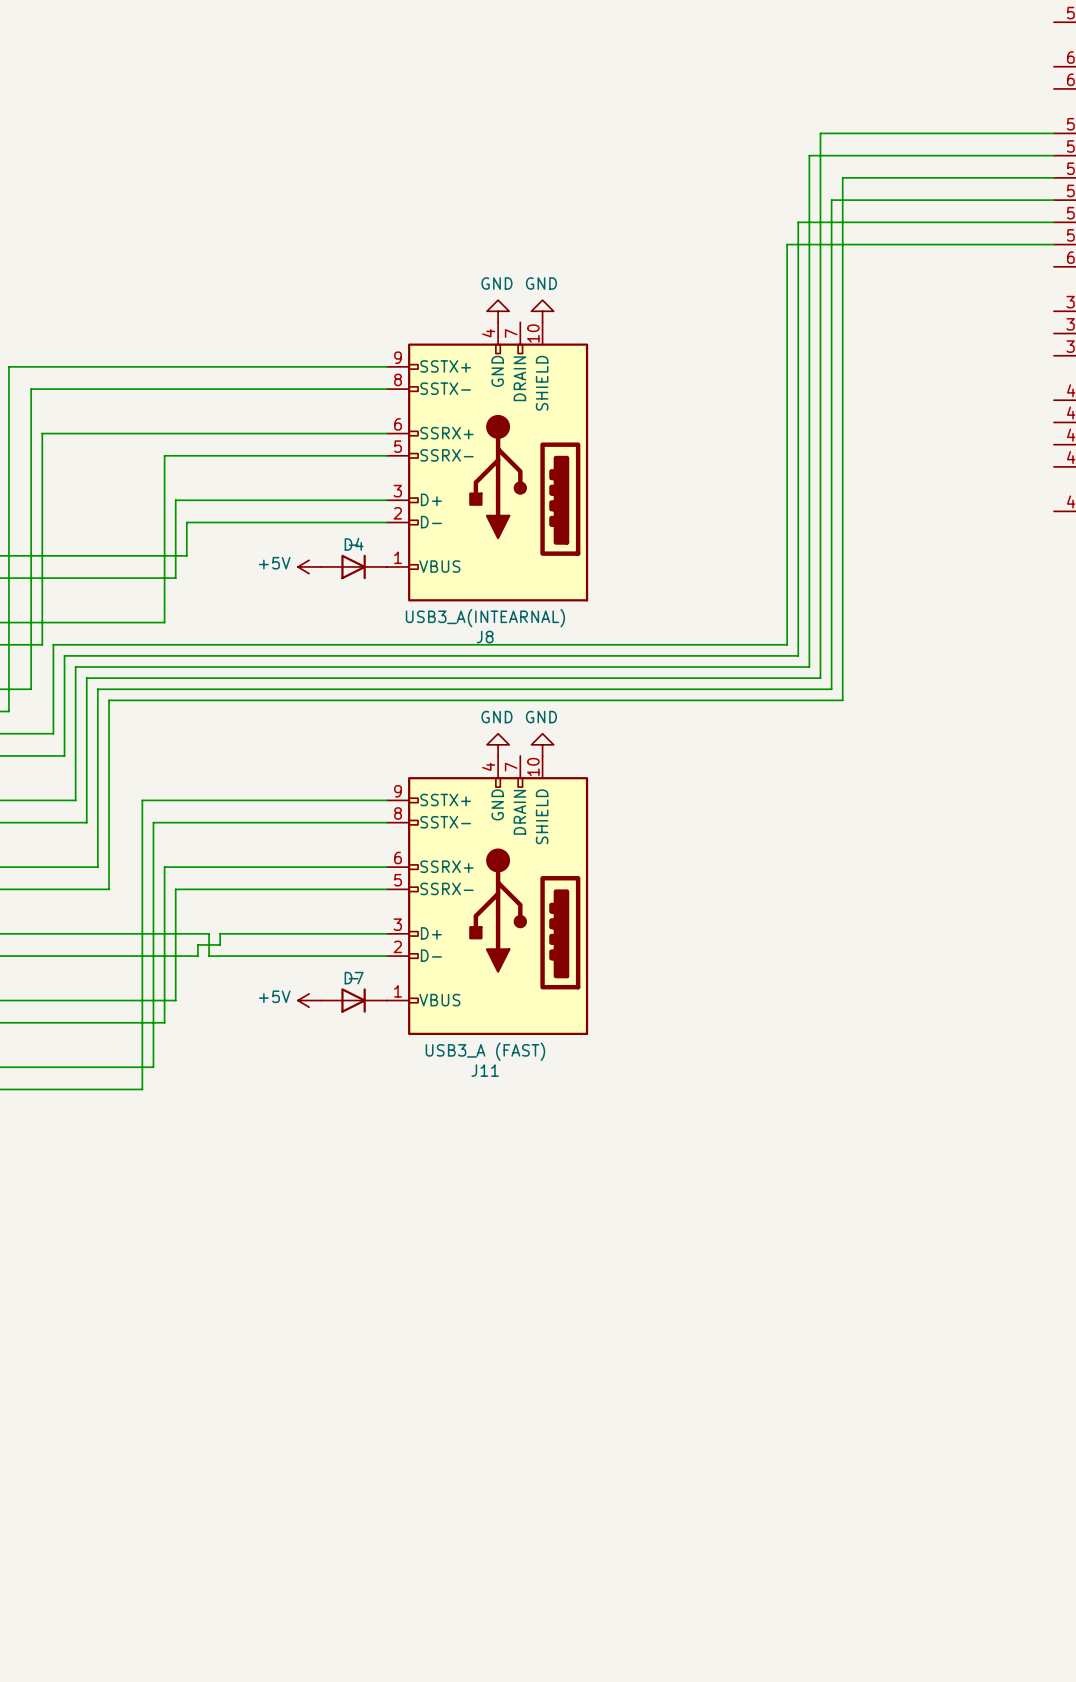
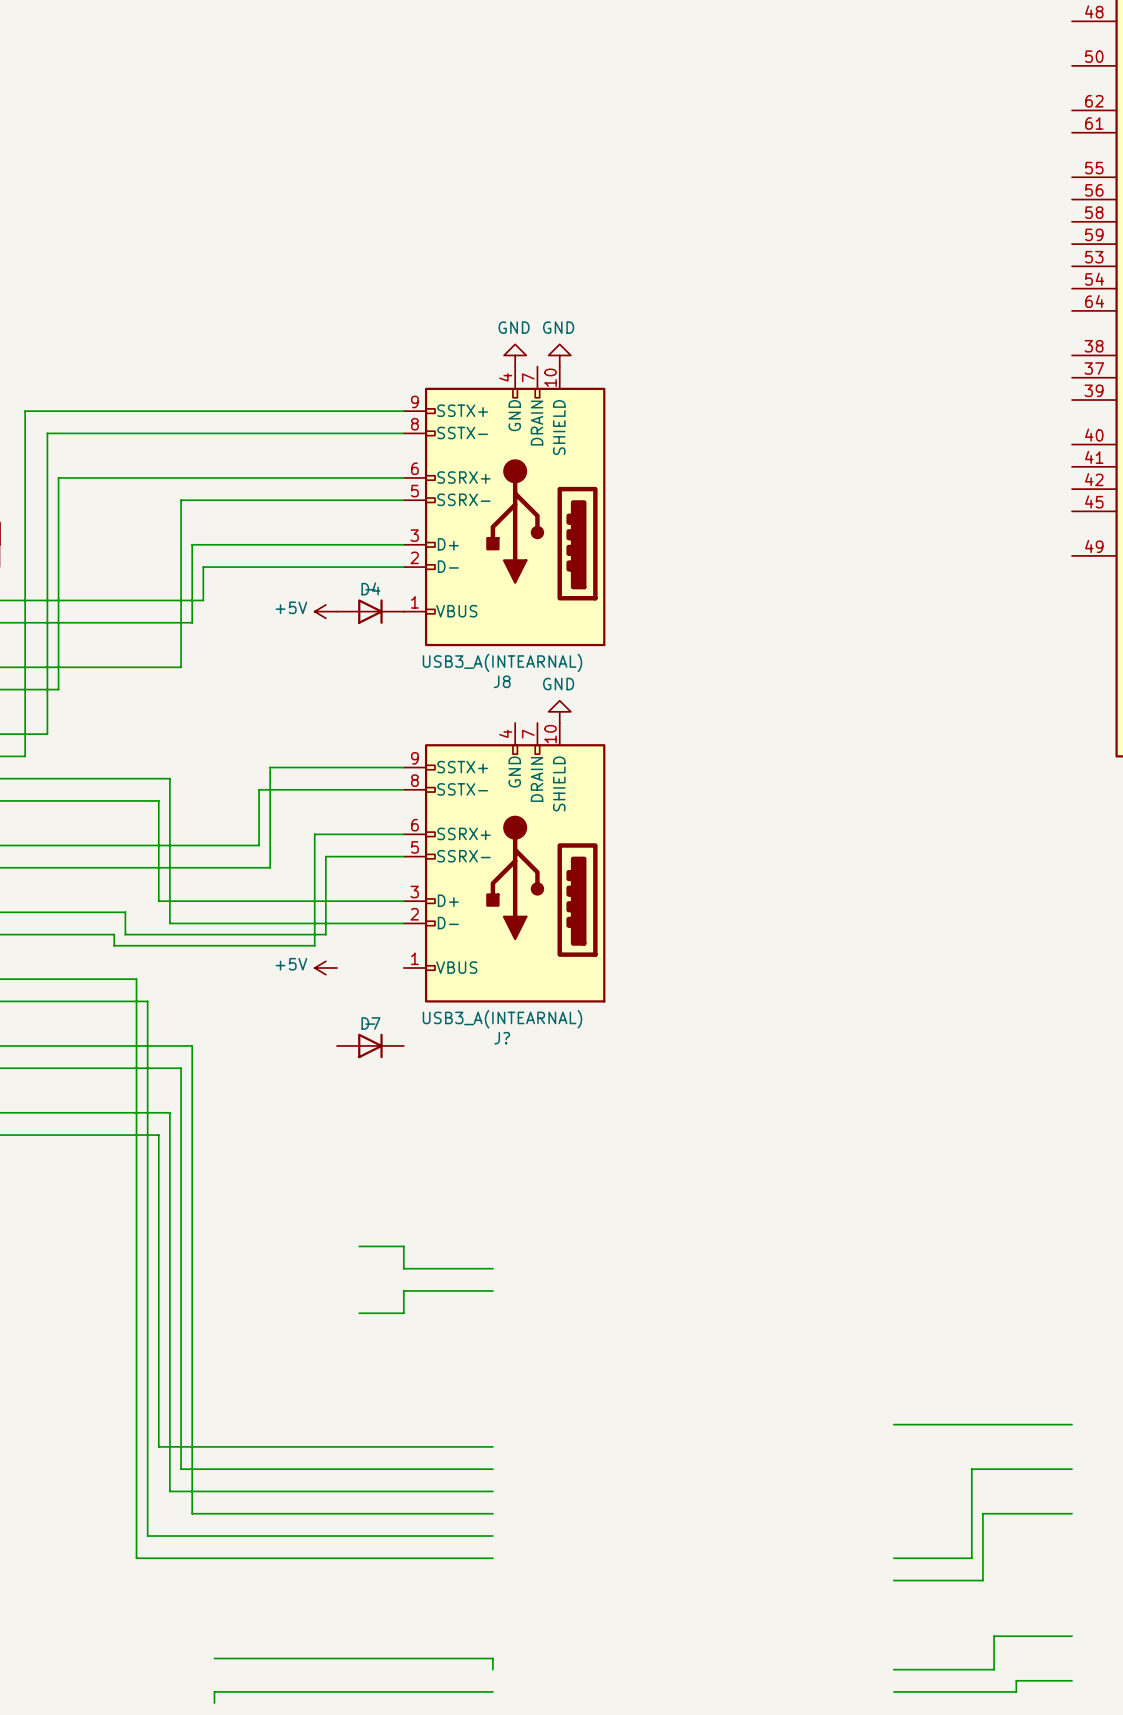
wire: (1053, 133) (820, 133) (820, 678) (86, 678) (86, 822) -> none
wire: (1053, 155) (809, 155) (809, 667) (75, 667) (75, 800) -> none
wire: (1053, 177) (842, 177) (842, 700) (109, 700) (109, 867) -> none
wire: (1053, 200) (831, 200) (831, 689) (97, 689) (97, 867) -> (125, 912) (114, 912)
wire: (1053, 222) (798, 222) (798, 655) (64, 655) (64, 755) -> (91, 845) (158, 845) (158, 800) (80, 800)
wire: (1053, 244) (787, 244) (787, 644) (53, 644) (53, 733) -> (103, 867) (169, 867) (169, 778) (69, 778)
power symbol: none -> GND (559, 711)
power symbol: GND (498, 744) -> none
power symbol: GND (542, 744) -> none
wire: none -> (403, 834) (314, 834) (314, 945) (114, 945) (114, 934)
wire: (242, 800) (386, 800) -> (259, 845) (259, 789) (403, 789)
J?: none -> USB3_A(INTEARNAL) (504, 862)
wire: (253, 822) (386, 822) -> (270, 867) (270, 767) (403, 767)
wire: (142, 856) (142, 1089) -> (158, 901) (403, 901)
wire: (386, 867) (164, 867) (164, 1022) -> (492, 1469) (181, 1469) (181, 1068)
wire: (153, 878) (153, 1067) -> (169, 923) (403, 923)
wire: (97, 889) (109, 889) -> (192, 934) (125, 934)
wire: (175, 889) (175, 1000) -> (492, 1513) (192, 1513) (192, 1045)
wire: (309, 889) (386, 889) -> (325, 934) (325, 856) (403, 856)
J11: USB3_A (FAST) (487, 895) -> none
wire: (120, 933) (209, 933) (209, 956) (386, 956) -> (136, 979) (136, 1558) (492, 1558)
wire: (386, 933) (220, 933) (220, 944) (197, 944) (197, 956) (131, 956) -> (492, 1536) (147, 1536) (147, 1001)
power symbol position: +5V (309, 1000) -> +5V (325, 968)
wire: none -> (169, 1112) (169, 1491) (492, 1491)
wire: none -> (158, 1135) (158, 1446) (492, 1446)
wire: none -> (359, 1246) (403, 1246) (403, 1268) (492, 1268)
wire: none -> (492, 1290) (403, 1290) (403, 1313) (359, 1313)
wire: none -> (893, 1424) (1072, 1424)
wire: none -> (1072, 1469) (971, 1469) (971, 1558) (893, 1558)
wire: none -> (1072, 1513) (982, 1513) (982, 1580) (893, 1580)
wire: none -> (1072, 1636) (994, 1636) (994, 1669) (893, 1669)
wire: none -> (214, 1658) (492, 1658) (492, 1669)
wire: none -> (1072, 1680) (1016, 1680) (1016, 1691) (893, 1691)
wire: none -> (492, 1691) (214, 1691) (214, 1703)

